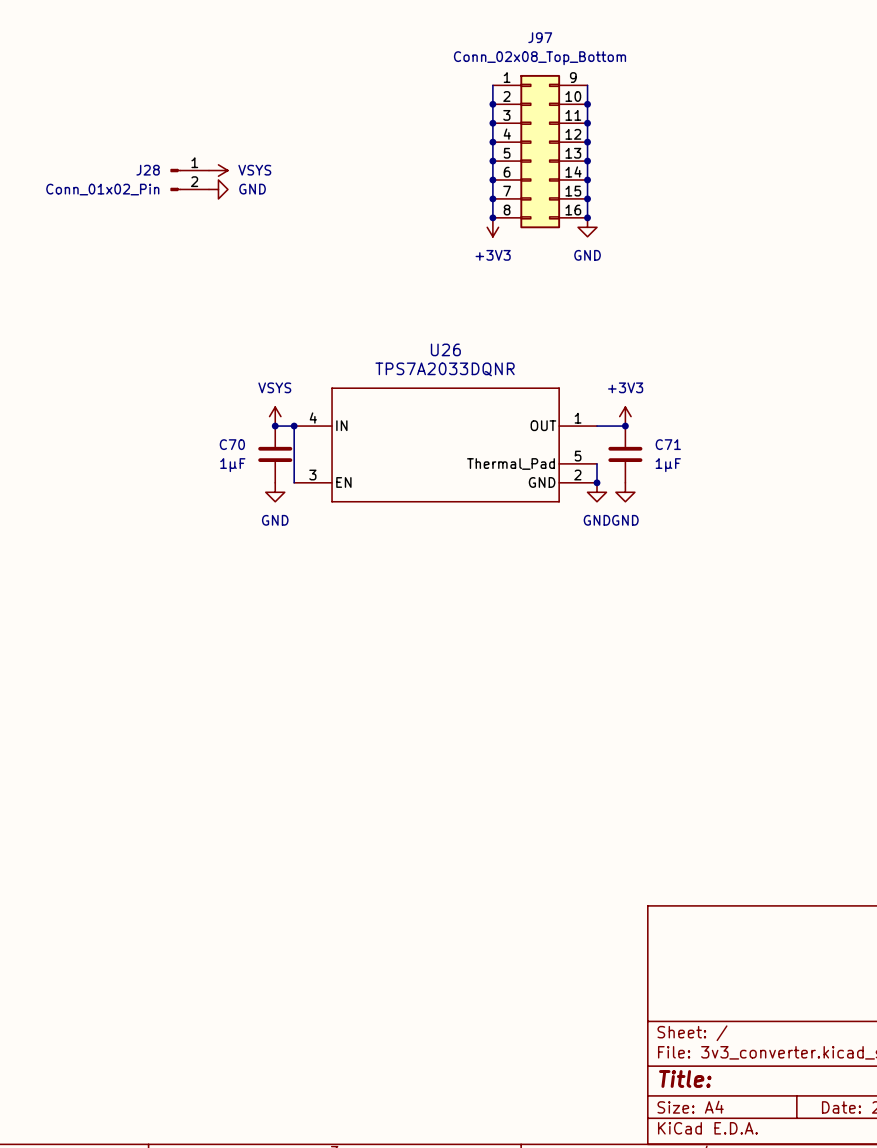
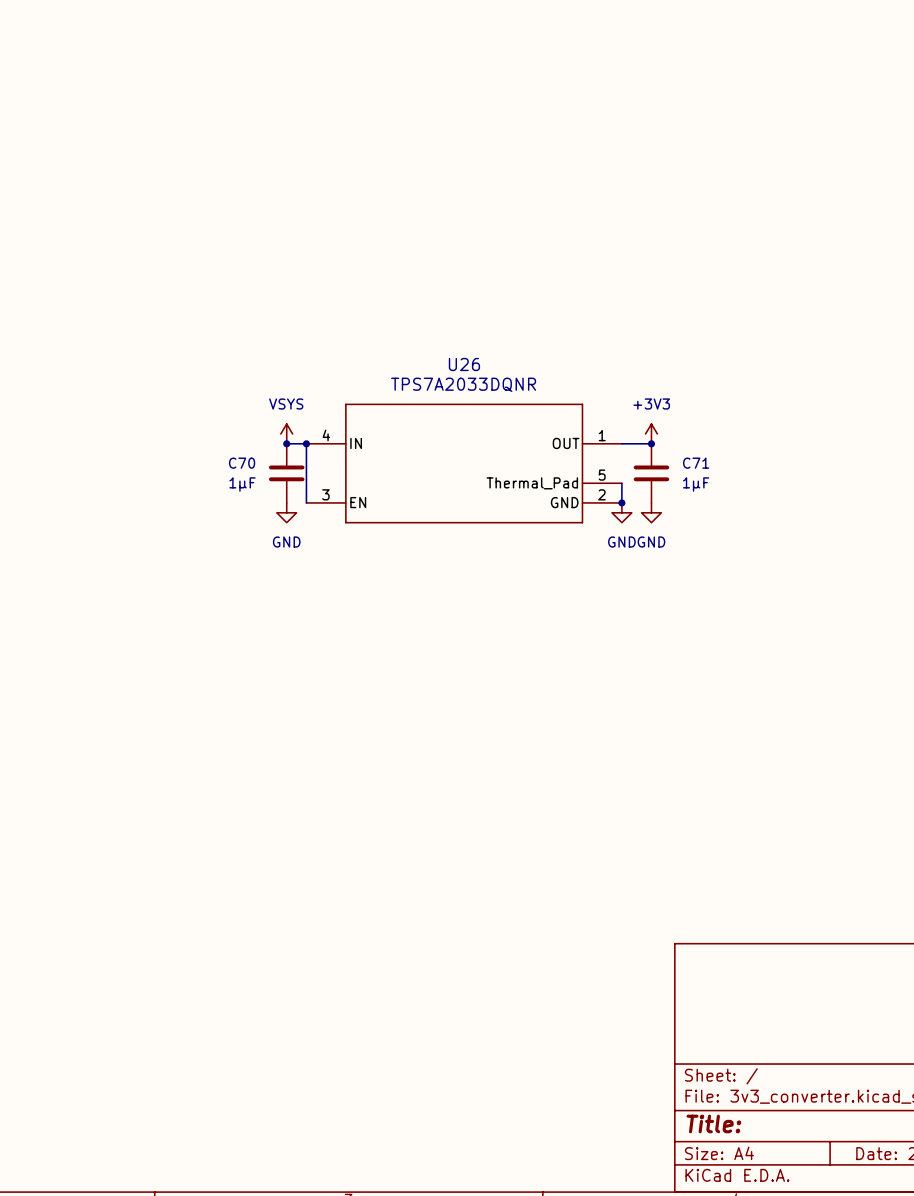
wire: (492, 85) (492, 217) -> none
wire: (587, 85) (587, 217) -> none
junction: (492, 104) -> none
junction: (587, 104) -> none
junction: (492, 123) -> none
junction: (587, 123) -> none
junction: (492, 142) -> none
junction: (587, 142) -> none
J97: Conn_02x08_Top_Bottom (540, 151) -> none
junction: (492, 161) -> none
junction: (587, 161) -> none
power symbol: VSYS (218, 170) -> none
J28: Conn_01x02_Pin (189, 180) -> none
junction: (492, 180) -> none
junction: (587, 180) -> none
power symbol: GND (218, 189) -> none
junction: (492, 198) -> none
junction: (587, 198) -> none
junction: (492, 217) -> none
junction: (587, 217) -> none
power symbol: +3V3 (492, 227) -> none
power symbol: GND (587, 227) -> none

